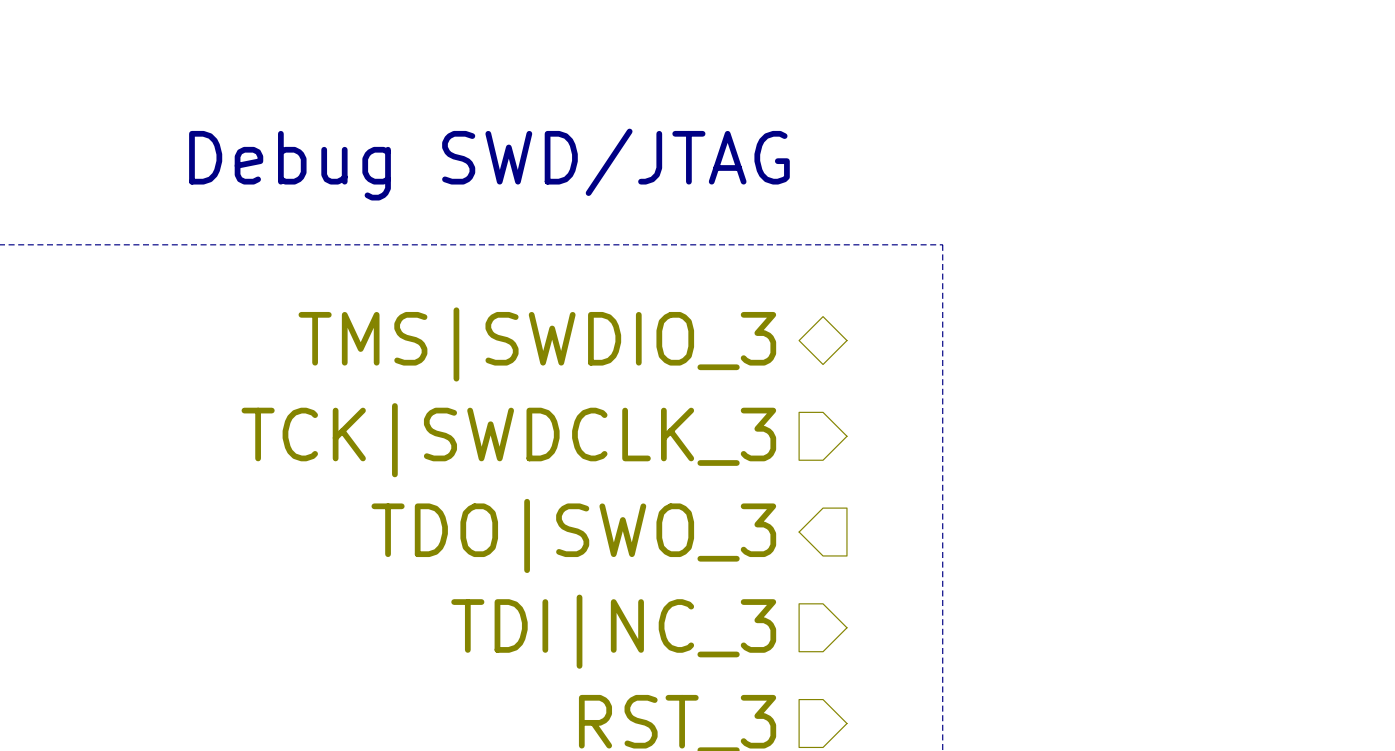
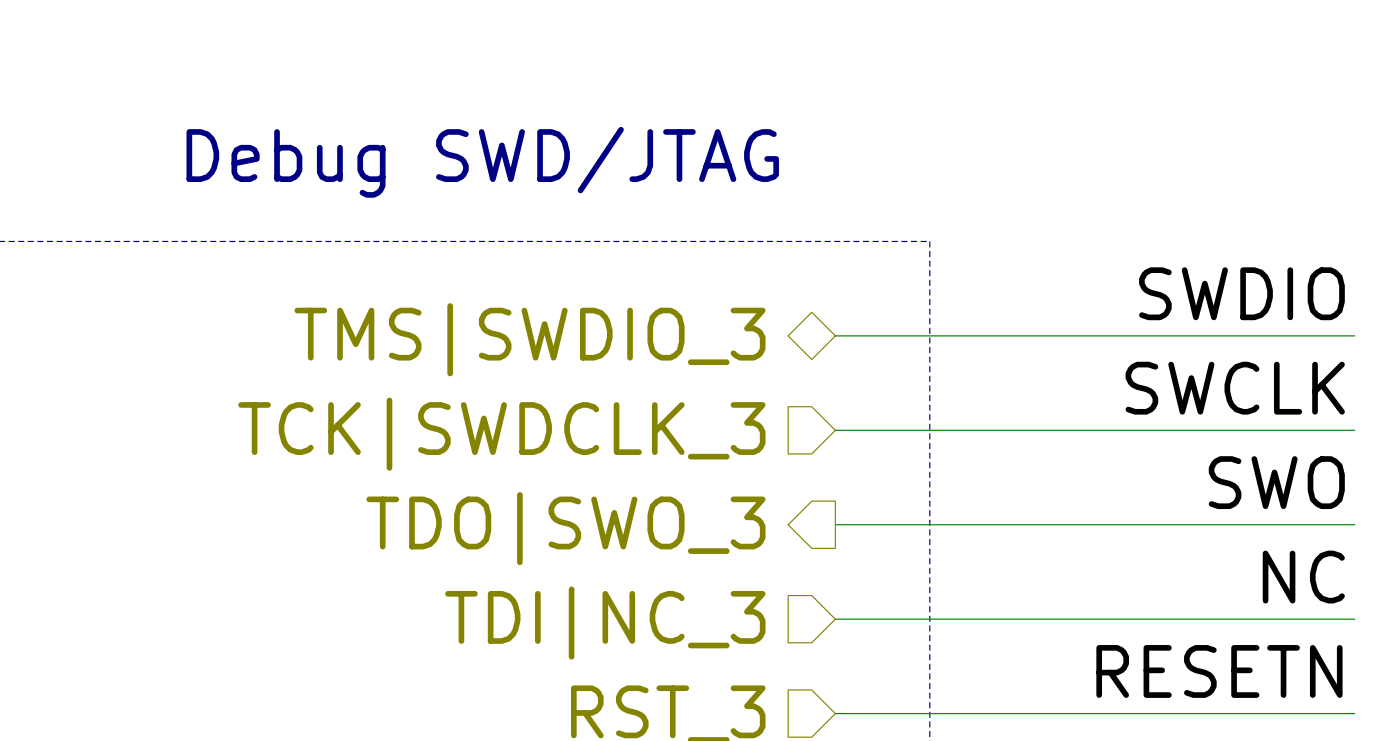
label: none -> SWDIO (1241, 293)
wire: none -> (835, 335) (1354, 335)
label: none -> SWCLK (1235, 388)
wire: none -> (835, 430) (1354, 430)
label: none -> SWO (1276, 482)
wire: none -> (835, 524) (1354, 524)
label: none -> NC (1303, 577)
wire: none -> (835, 619) (1354, 619)
label: none -> RESETN (1219, 671)
wire: none -> (835, 713) (1354, 713)

